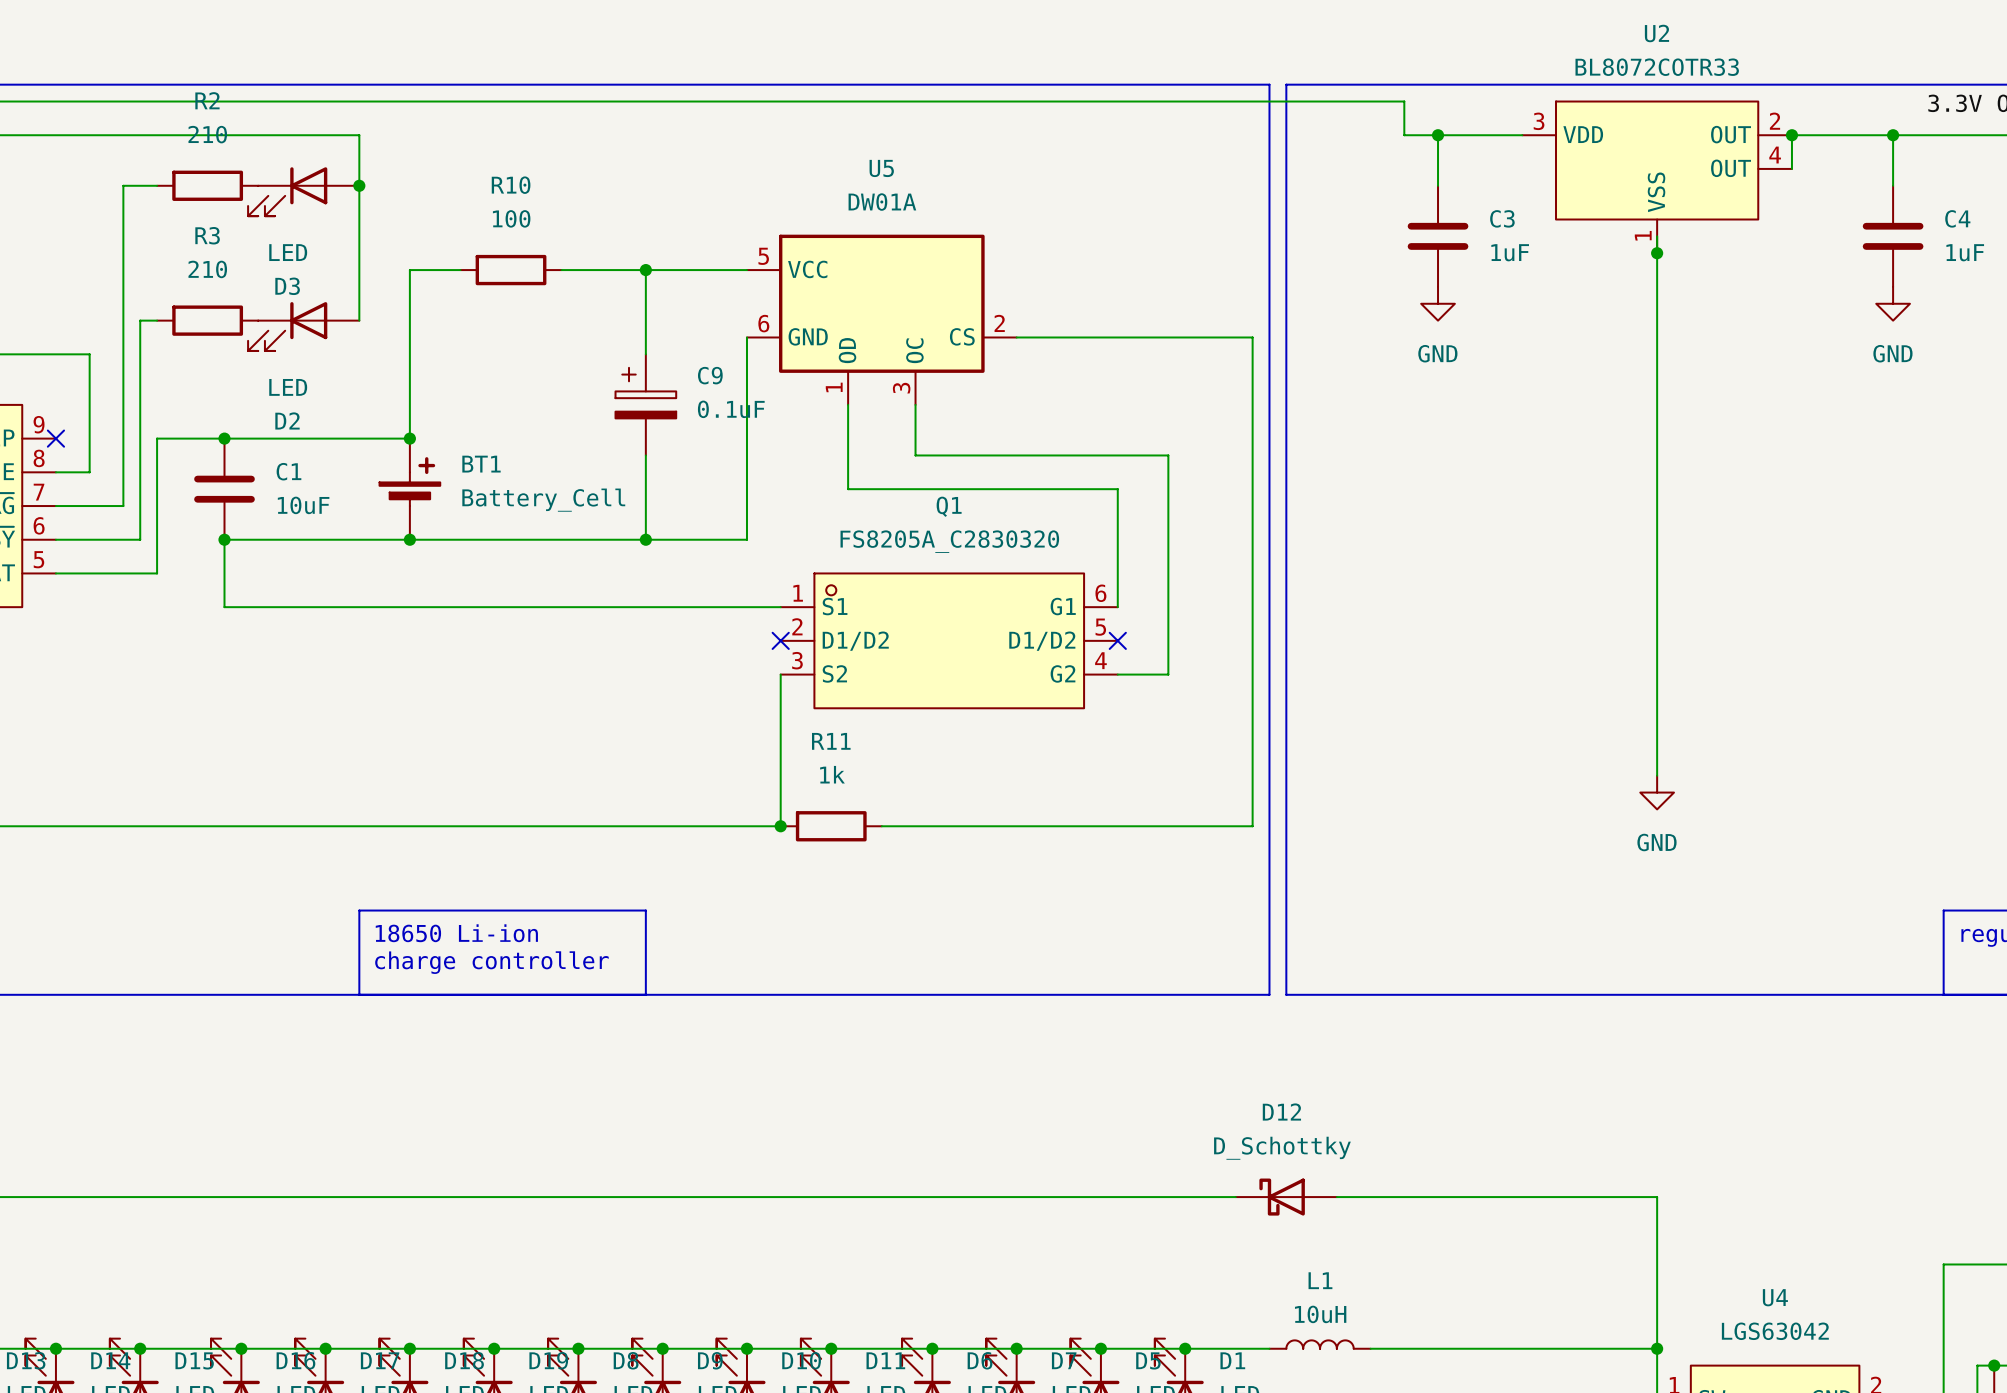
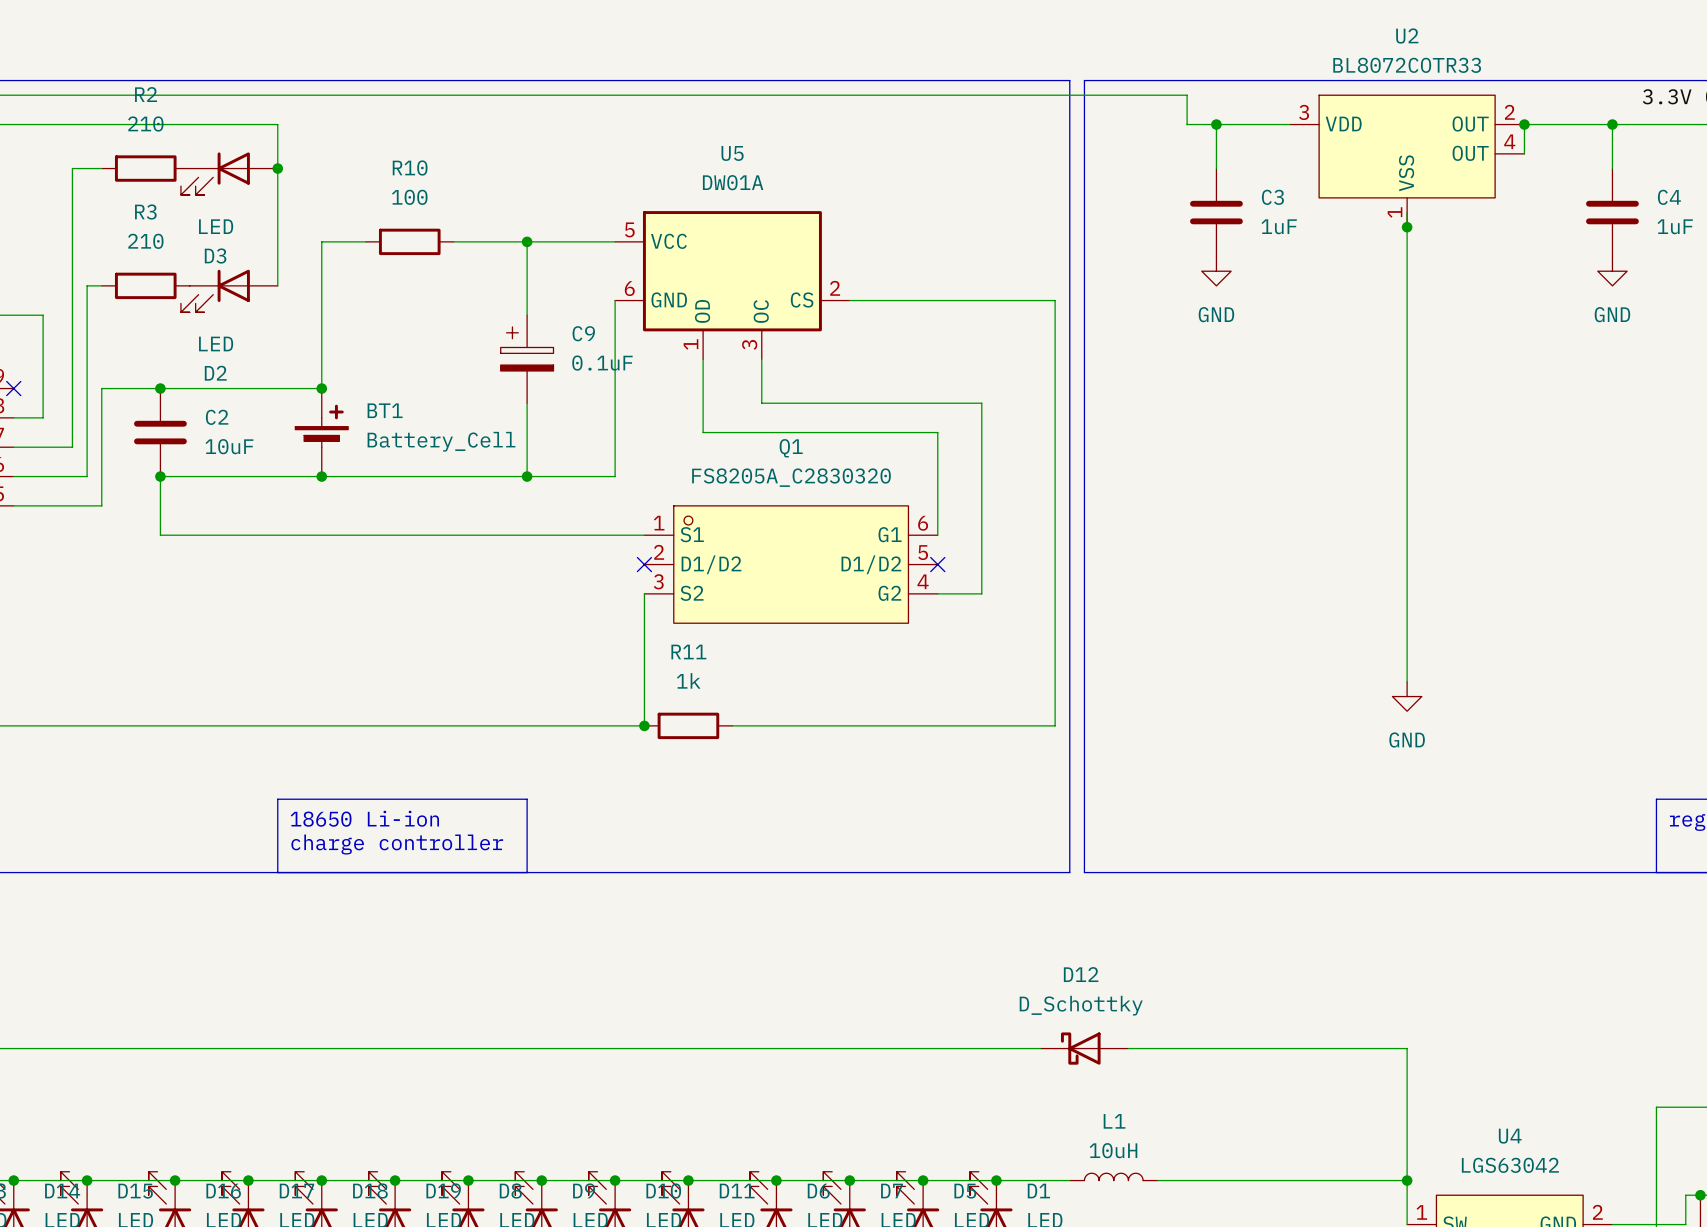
C1 name: C1 (288, 471) -> C2 (217, 417)

